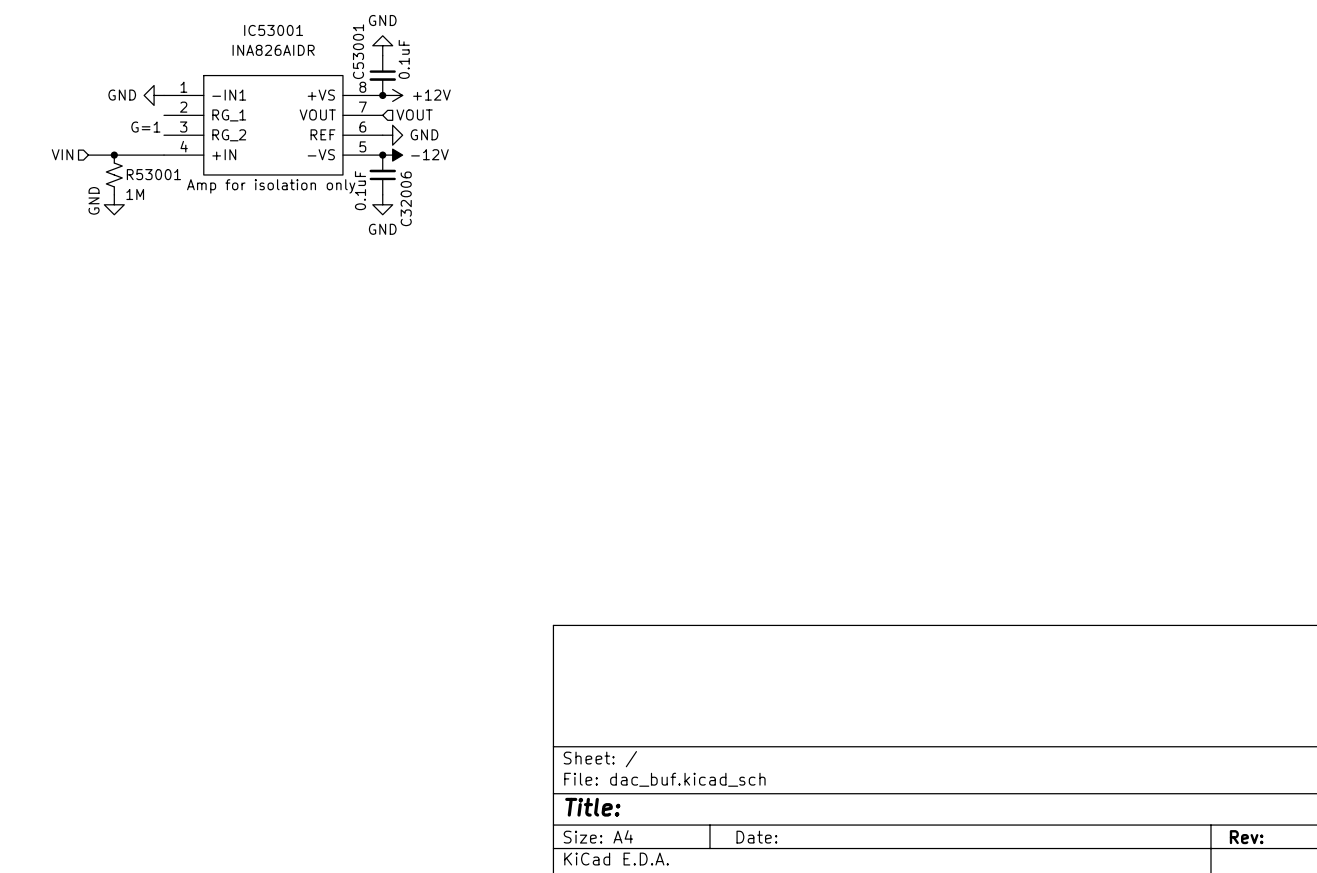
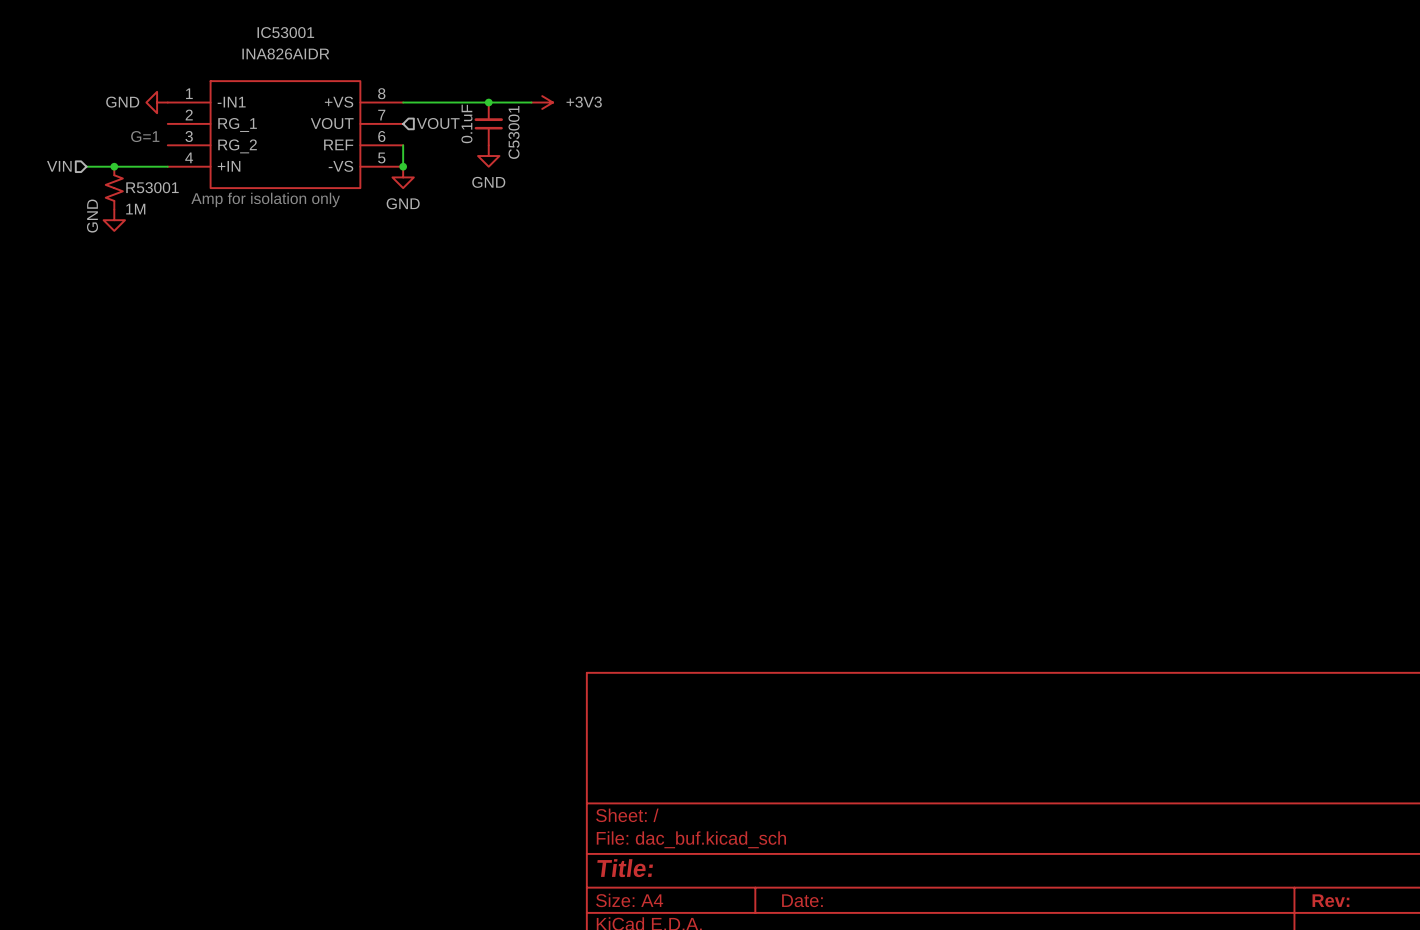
power symbol: GND (382, 45) -> none
C53001 name position: C53001 (358, 51) -> C53001 (514, 132)
C53001 value position: 0.1uF (404, 59) -> 0.1uF (466, 123)
C53001 rotation: 0° (382, 75) -> 180° (488, 123)
C53001 position: (382, 75) -> (488, 123)
wire: none -> (403, 102) (531, 102)
junction: (382, 95) -> none
power symbol: +12V (392, 95) -> none
junction: none -> (488, 102)
power symbol: none -> +3V3 (542, 102)
wire: none -> (403, 145) (403, 166)
power symbol: GND (392, 135) -> none
power symbol: none -> GND (488, 156)
power symbol: -12V (392, 155) -> none
power symbol: none -> GND (403, 177)
C32006: 0.1uF (382, 174) -> none
power symbol: GND (382, 204) -> none

